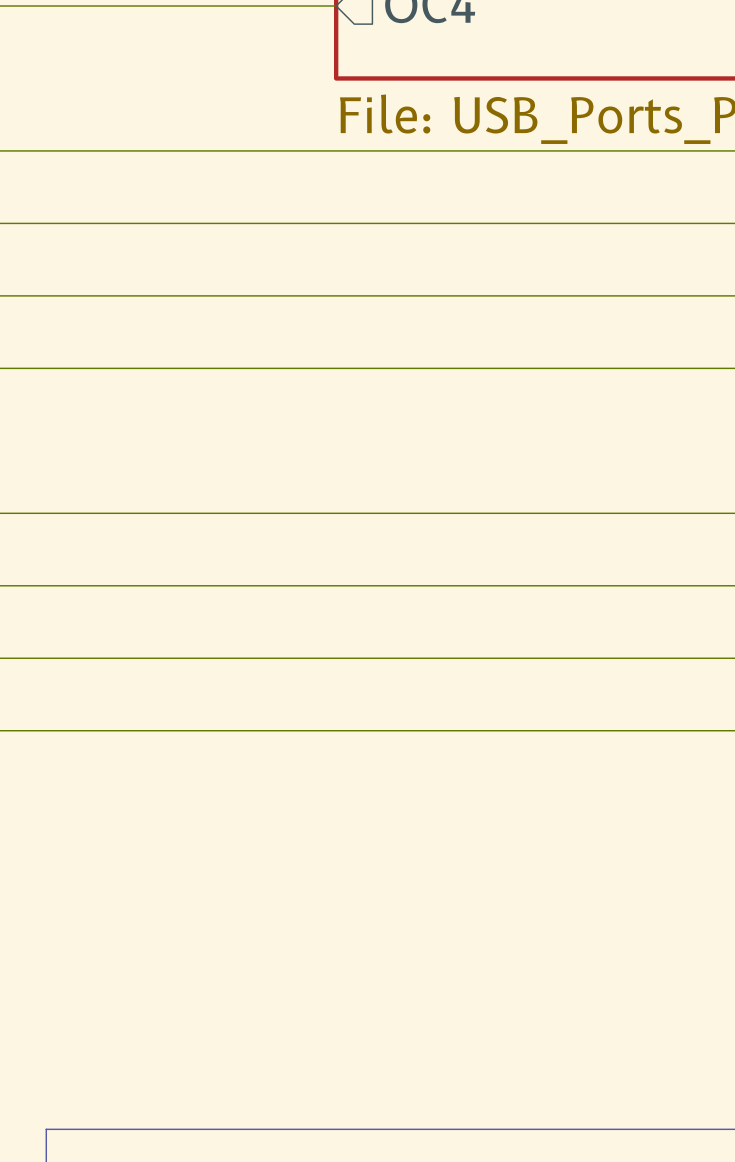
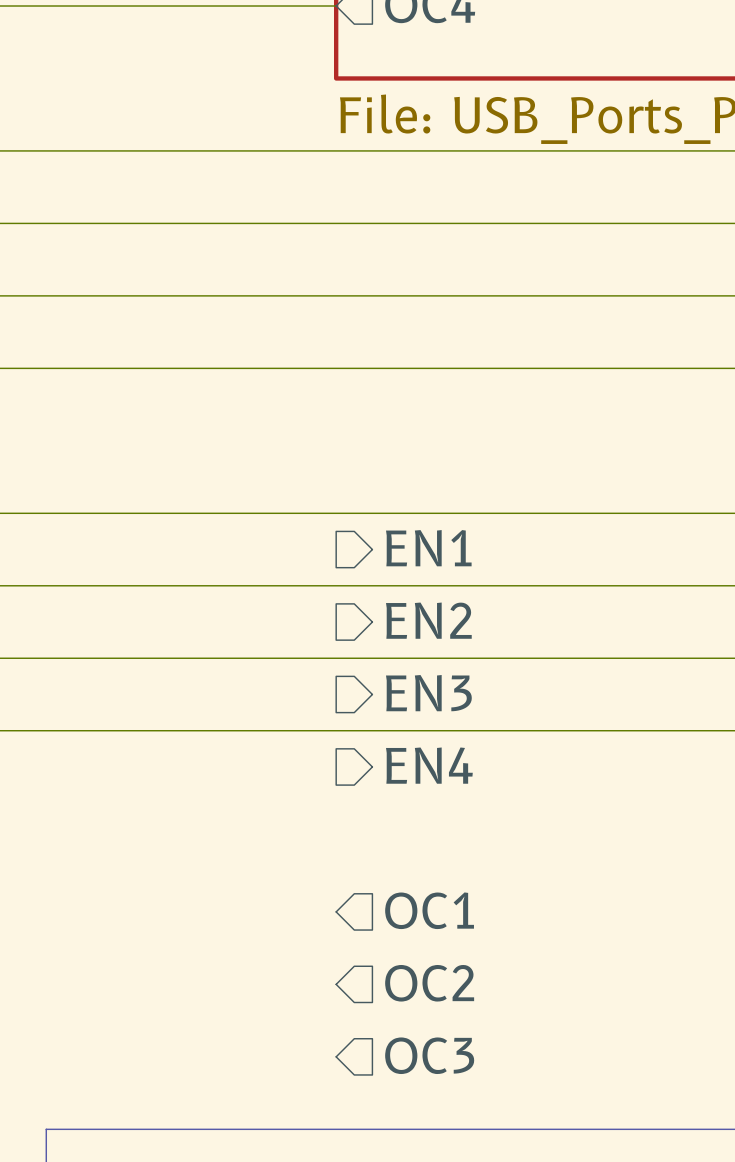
sheet pin: none -> EN1 (428, 548)
sheet pin: none -> EN2 (428, 620)
sheet pin: none -> EN3 (428, 693)
sheet pin: none -> EN4 (429, 765)
sheet pin: none -> OC1 (429, 910)
sheet pin: none -> OC2 (429, 983)
sheet pin: none -> OC3 (429, 1055)

